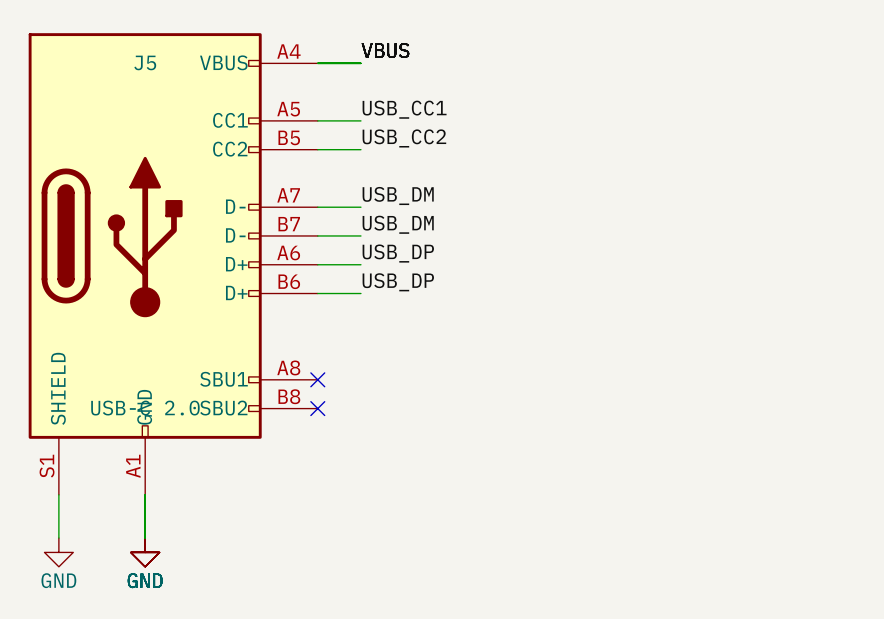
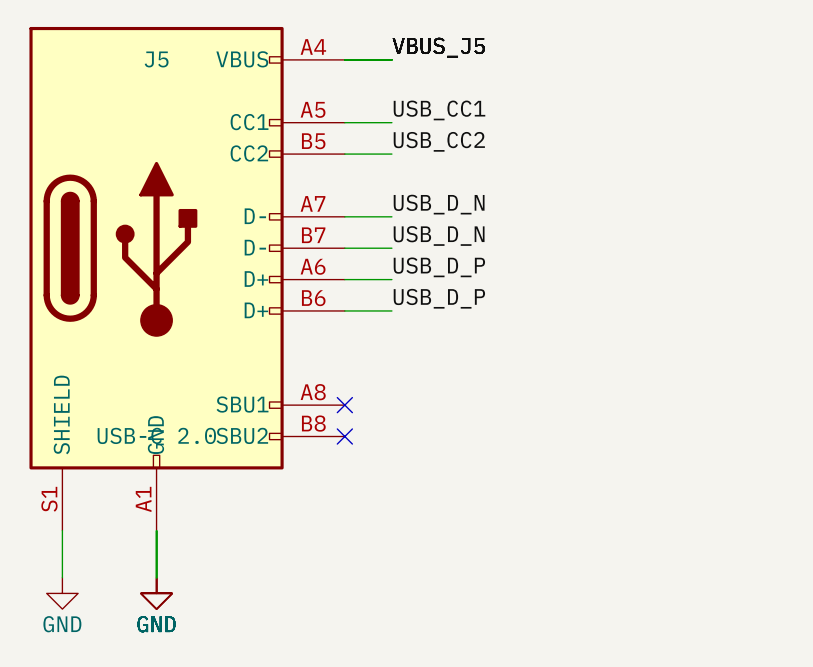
label: VBUS (385, 50) -> VBUS_J5 (438, 47)
label: USB_DM (398, 196) -> USB_D_N (439, 204)
label: USB_DM (398, 224) -> USB_D_N (439, 235)
label: USB_DP (398, 253) -> USB_D_P (439, 267)
label: USB_DP (398, 282) -> USB_D_P (439, 298)

